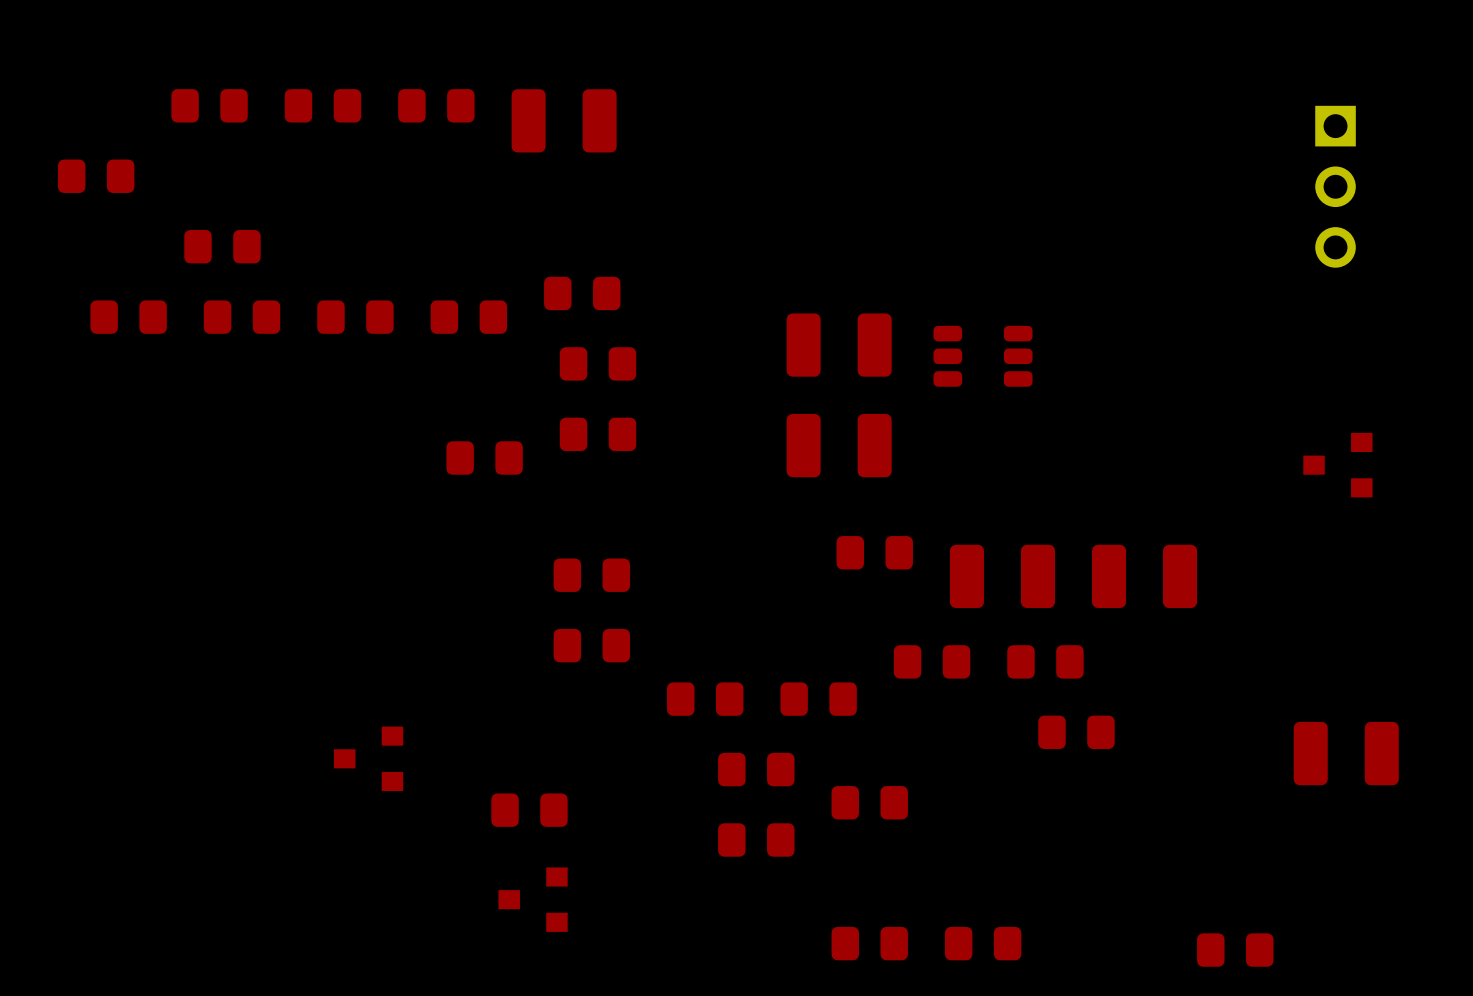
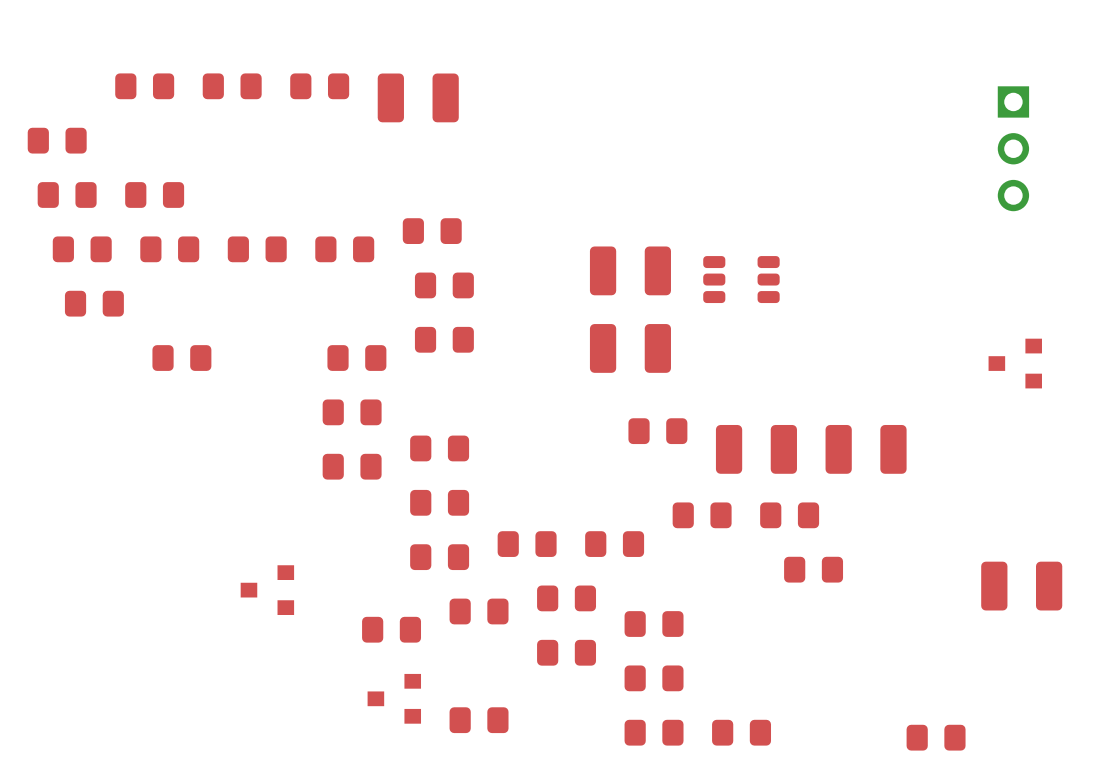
part: none -> (67, 194)
part: none -> (94, 303)
part: none -> (181, 358)
part: none -> (352, 412)
part: none -> (352, 466)
part: none -> (439, 557)
part: none -> (479, 611)
part: none -> (654, 678)
part: none -> (479, 720)

